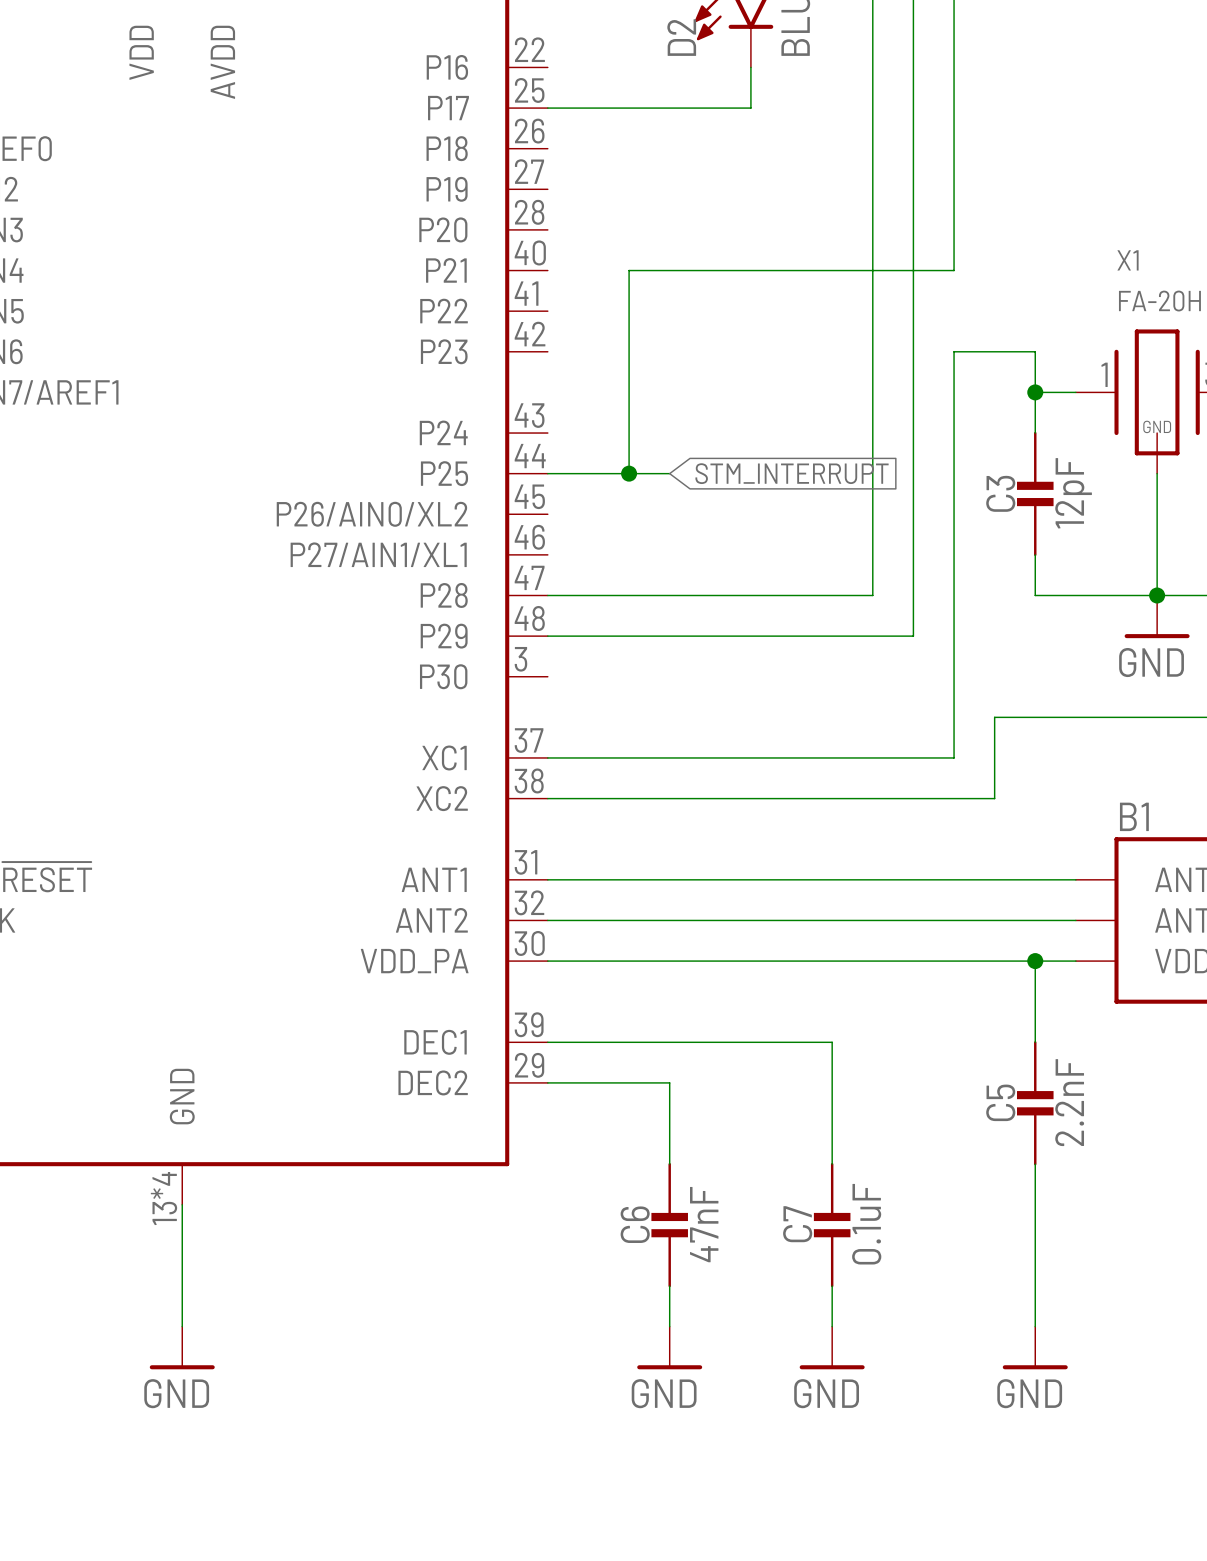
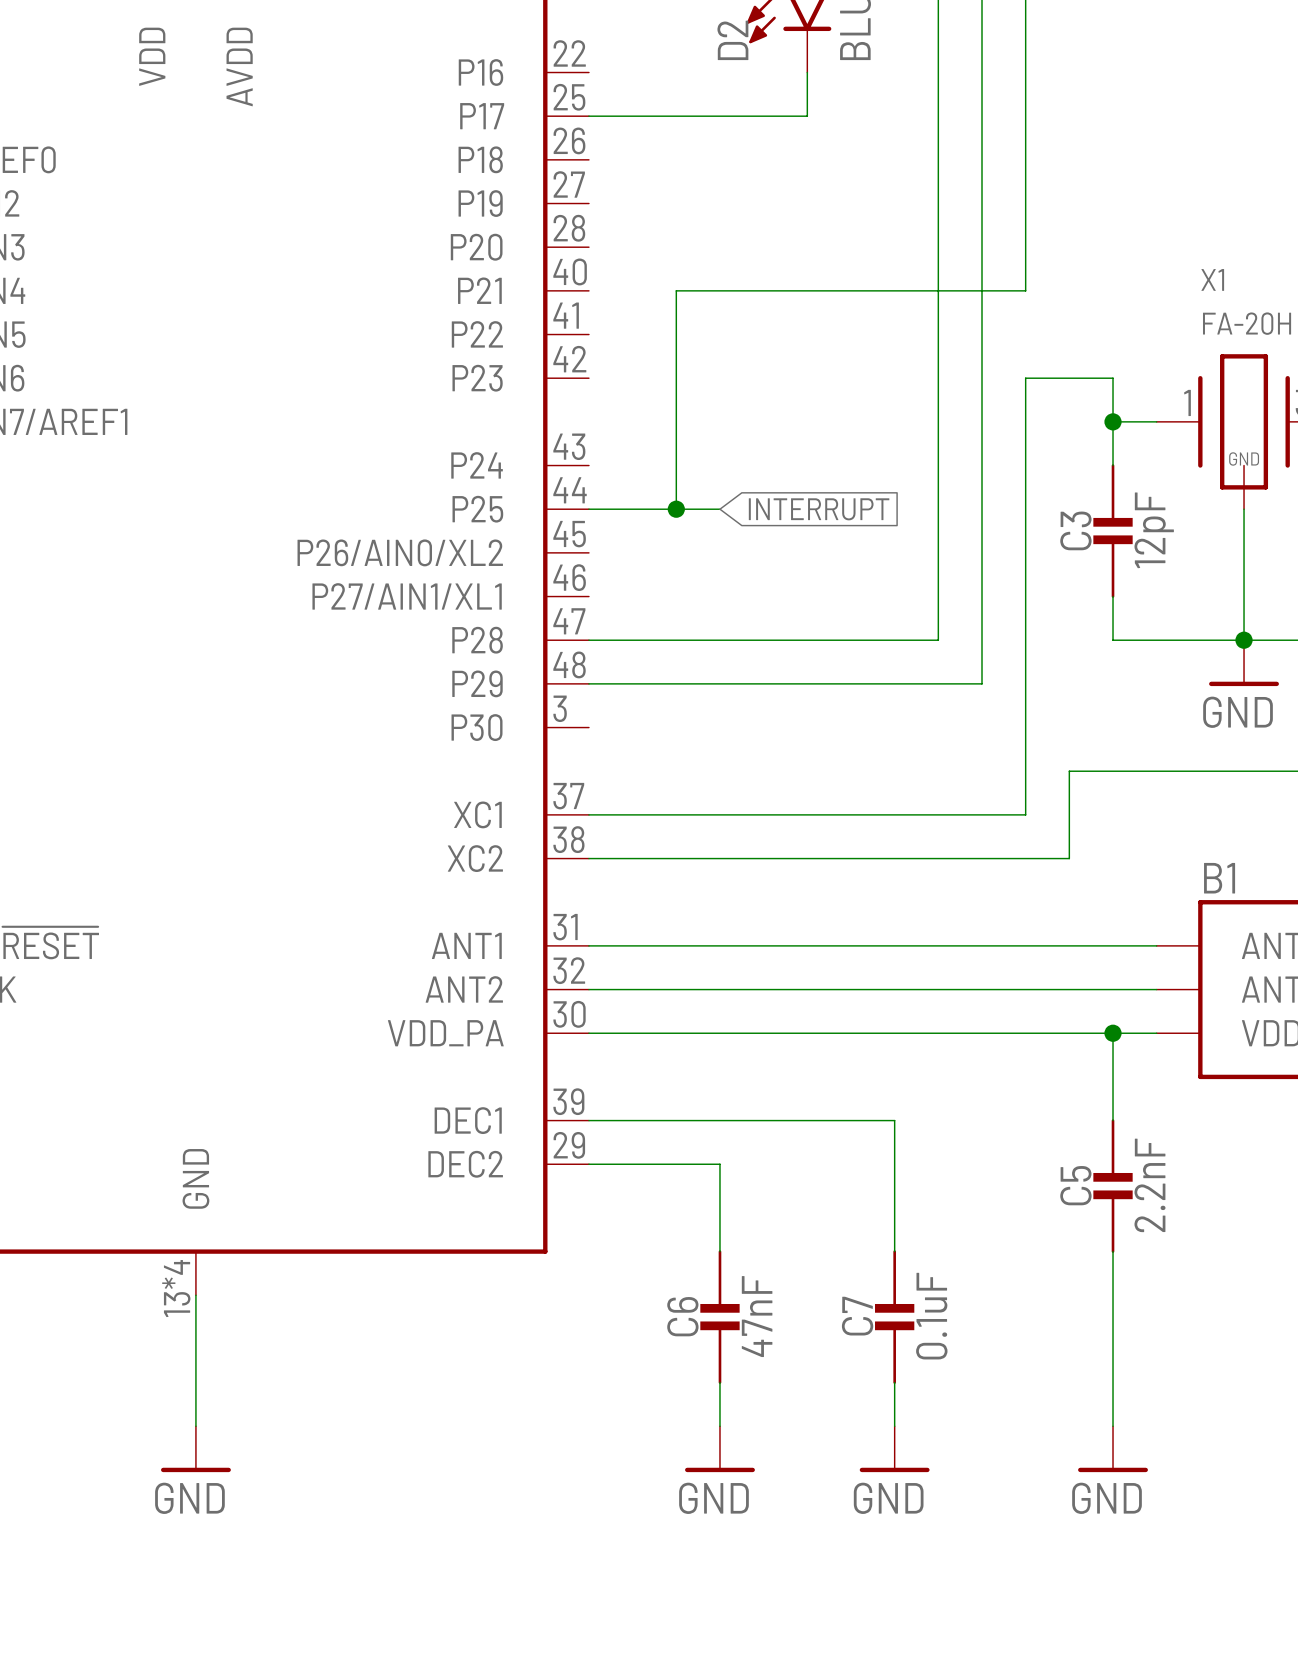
global label: STM_INTERRUPT (792, 473) -> INTERRUPT (819, 509)

